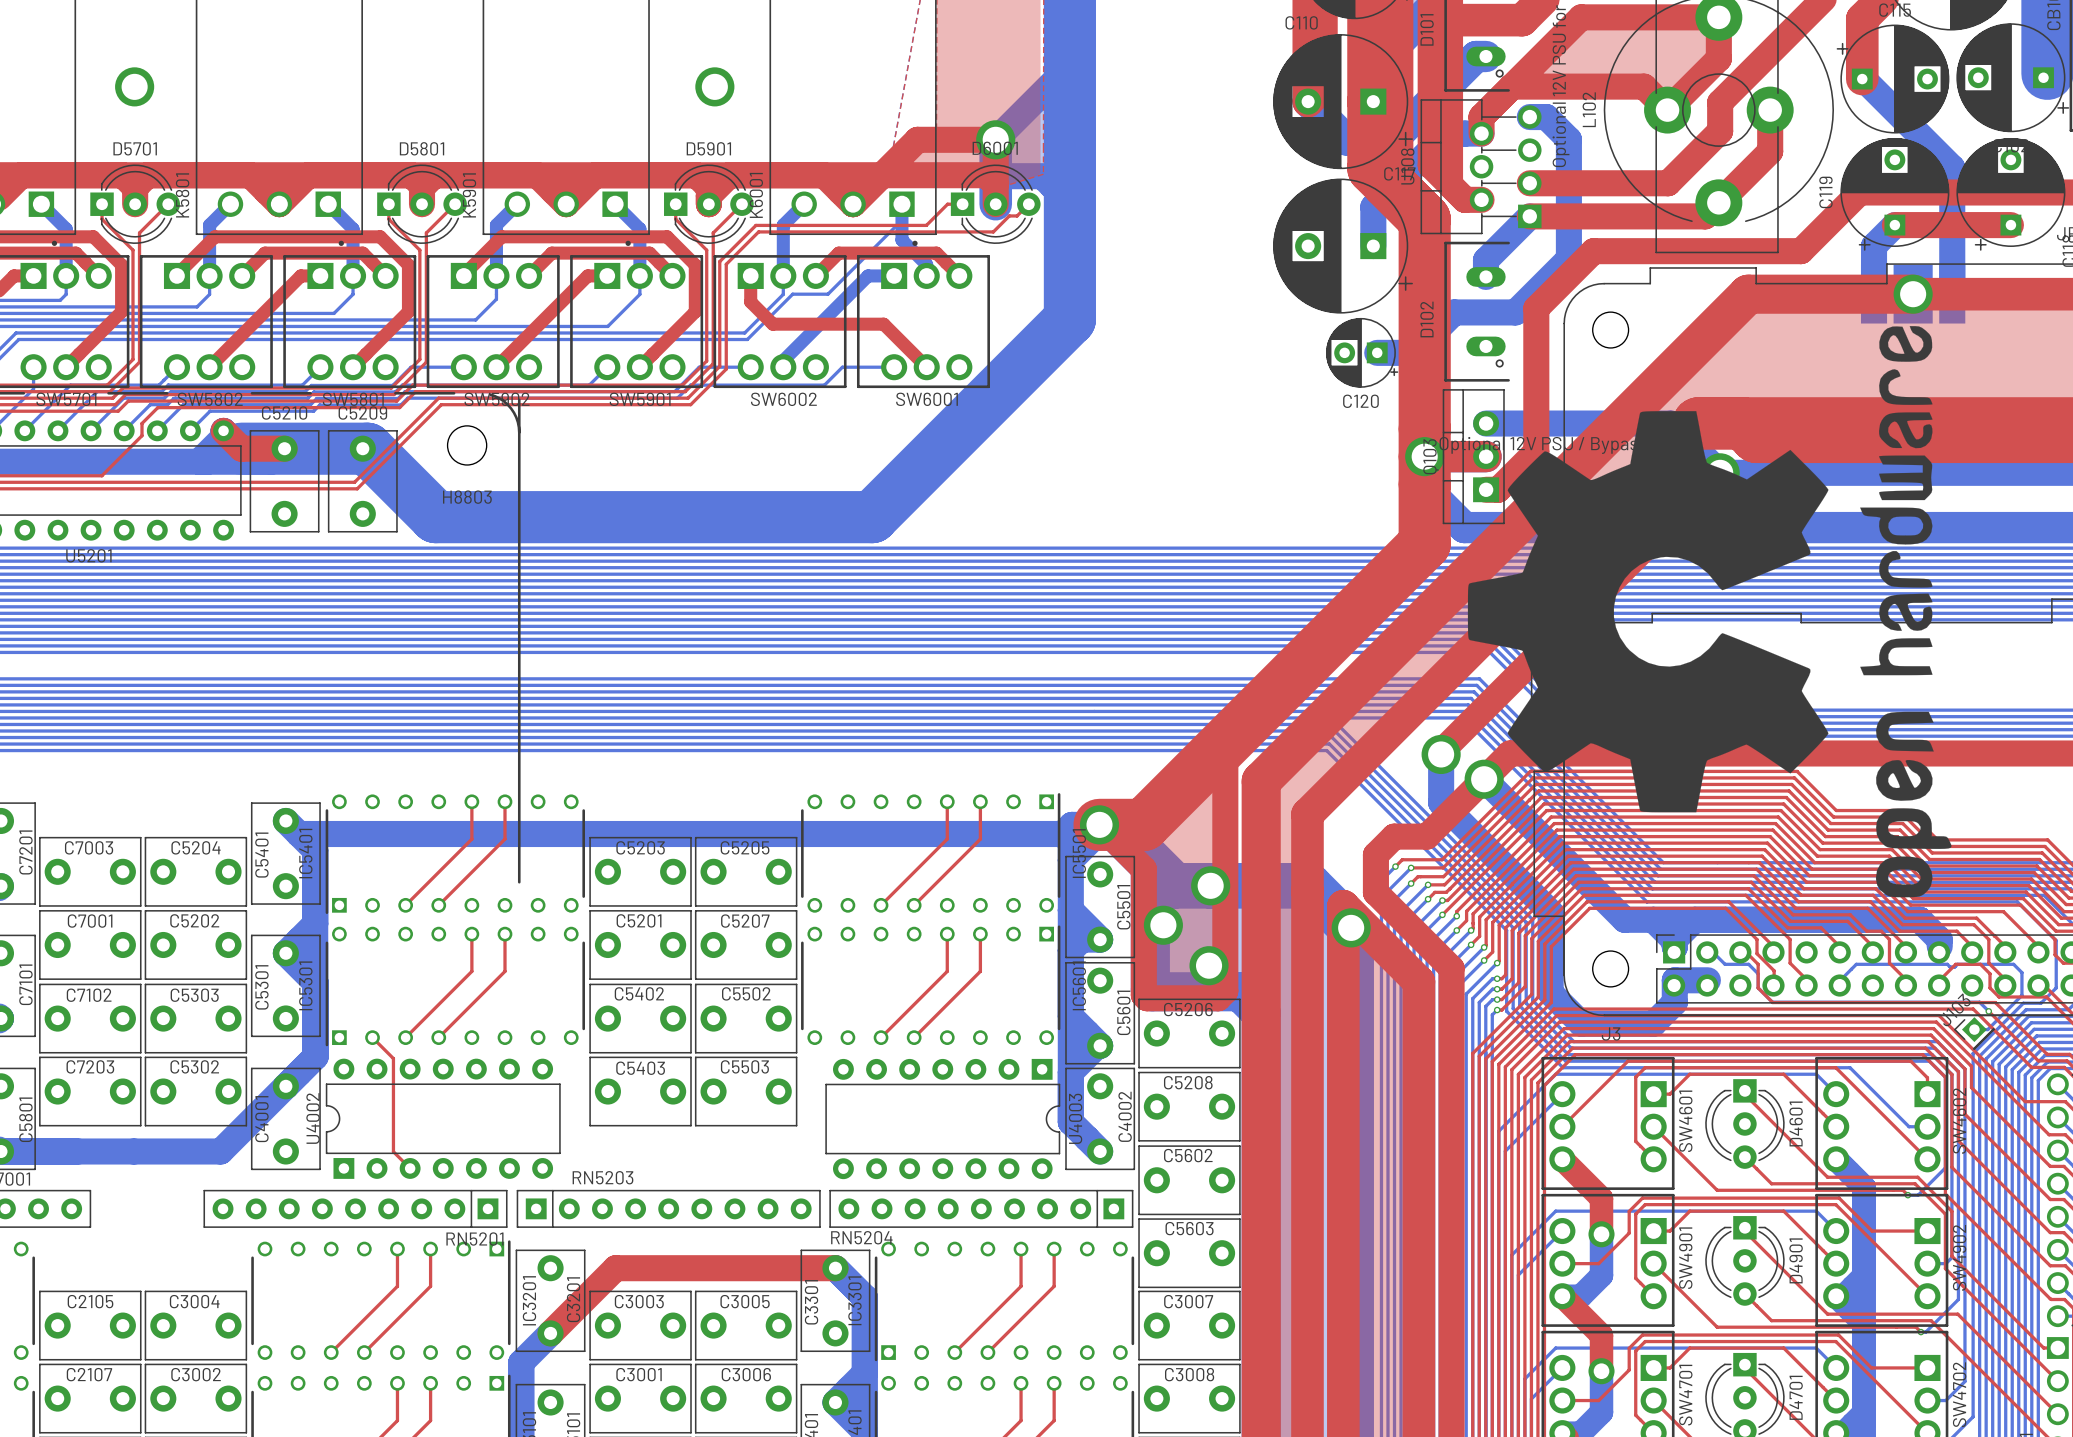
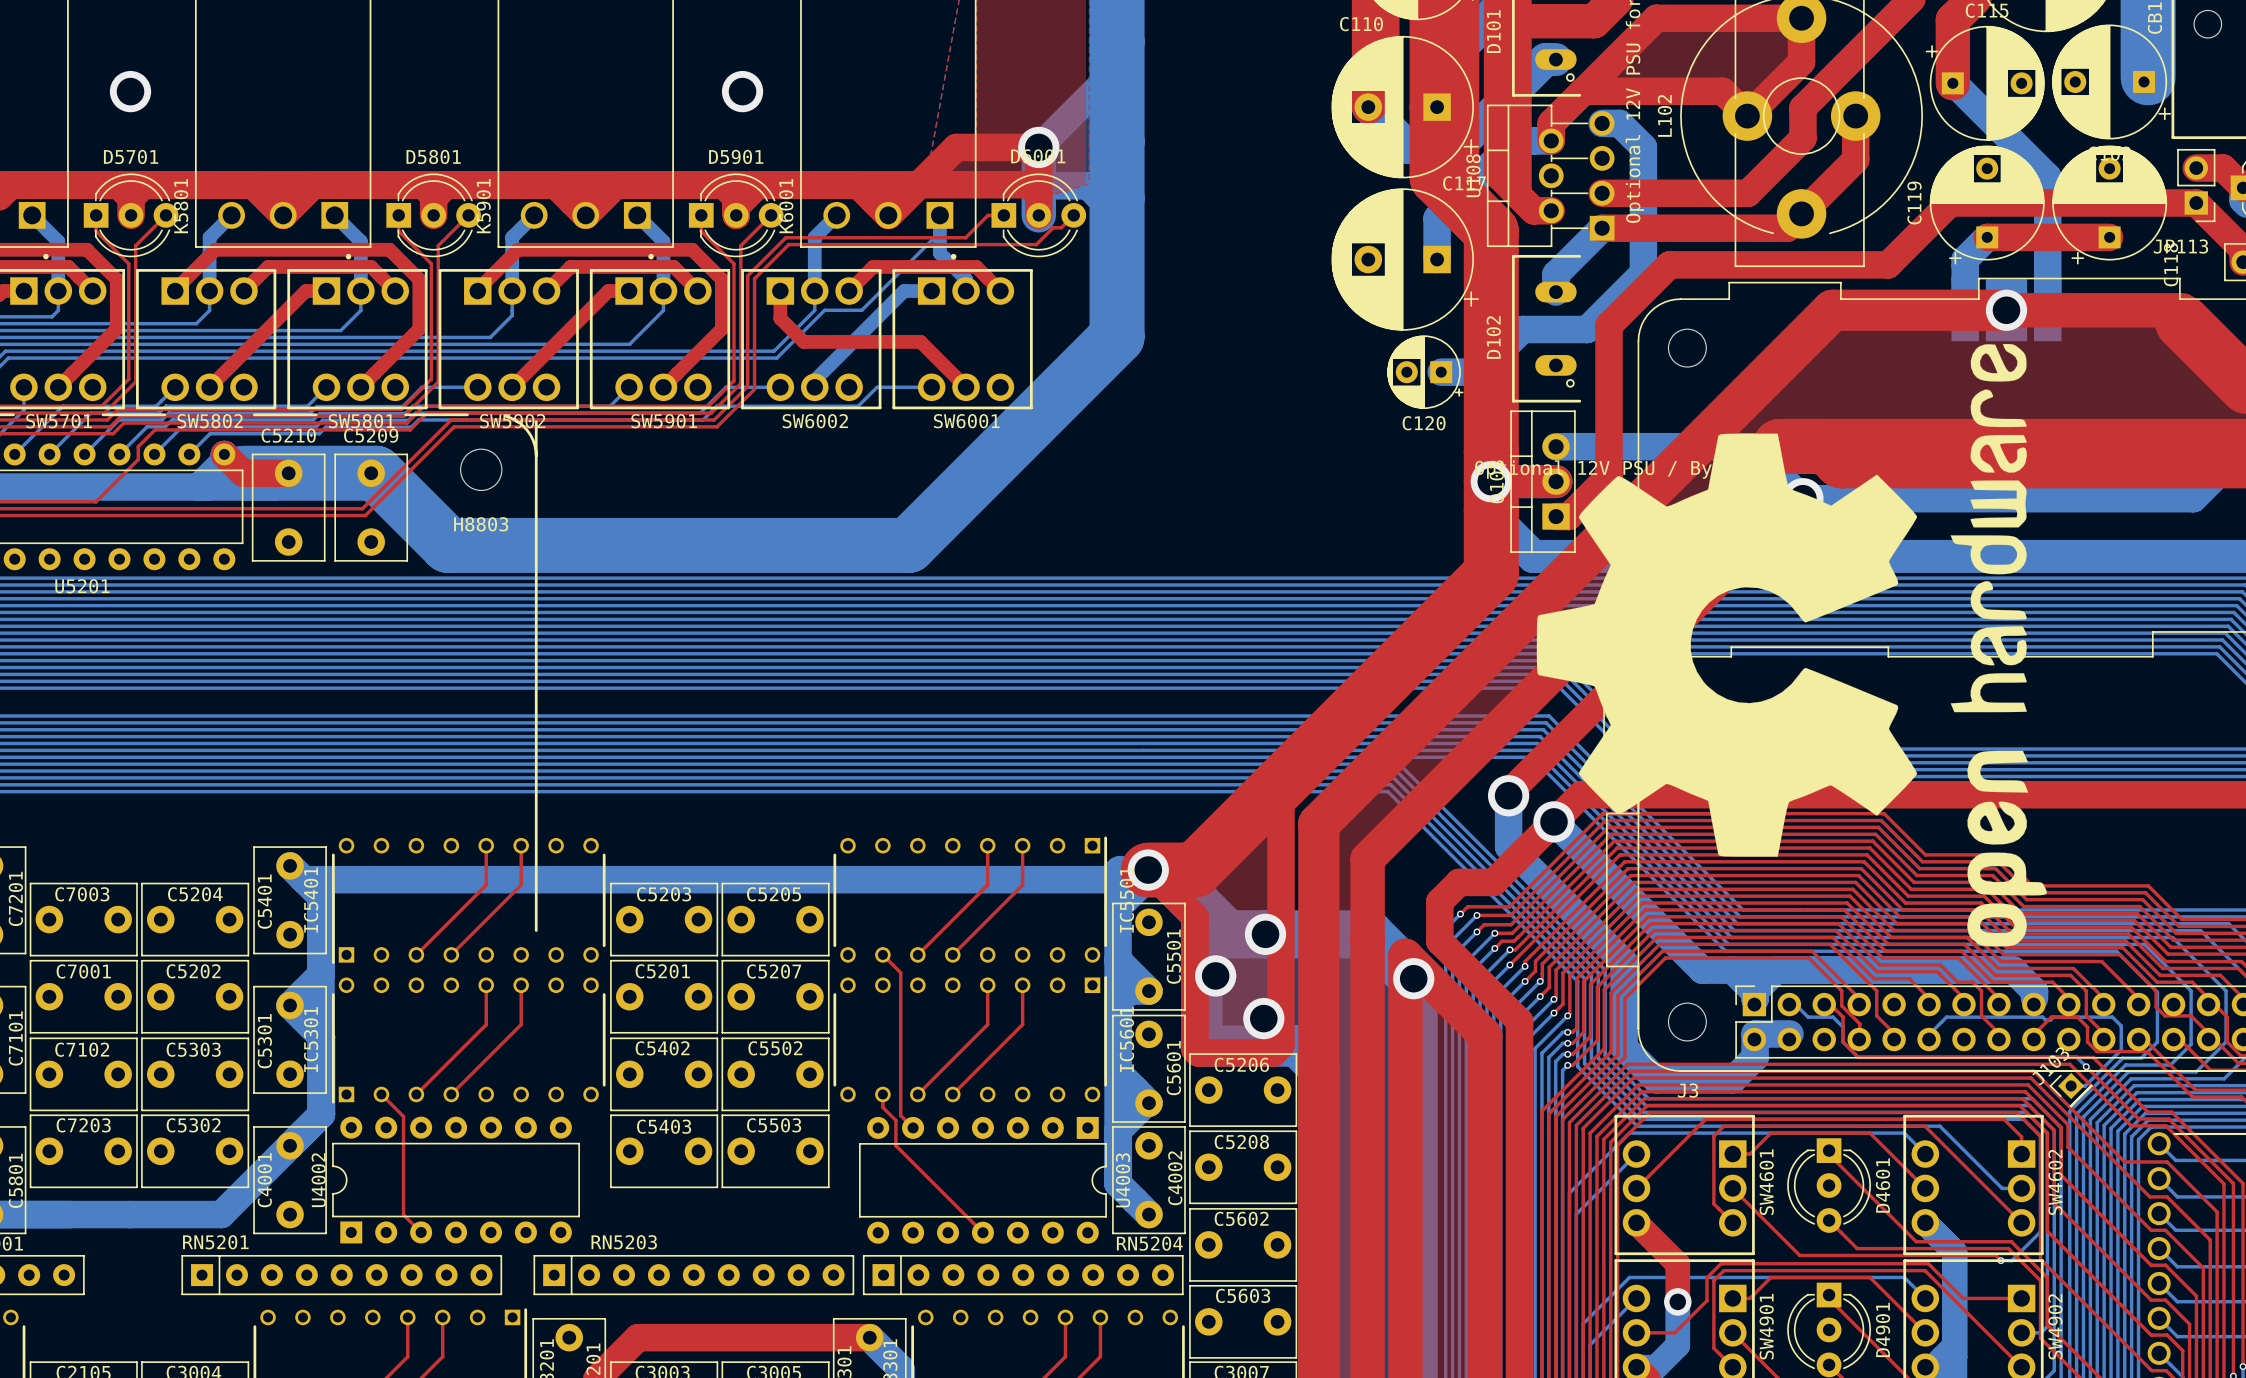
top track: none -> (882, 954) (900, 972) (900, 1115) (913, 1127)
top track: none -> (882, 1094) (882, 1107) (895, 1120) (895, 1145) (982, 1232)
RN5201 rotation: 0° (355, 1208) -> 180° (341, 1275)
RN5204 rotation: 0° (981, 1208) -> 180° (1023, 1275)

